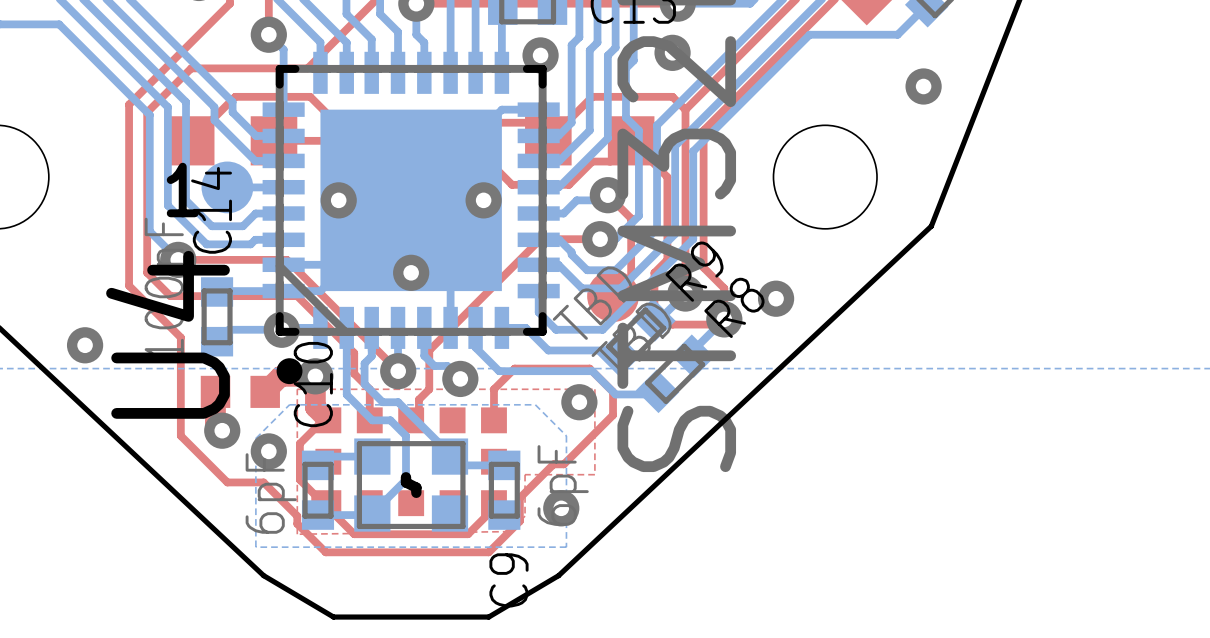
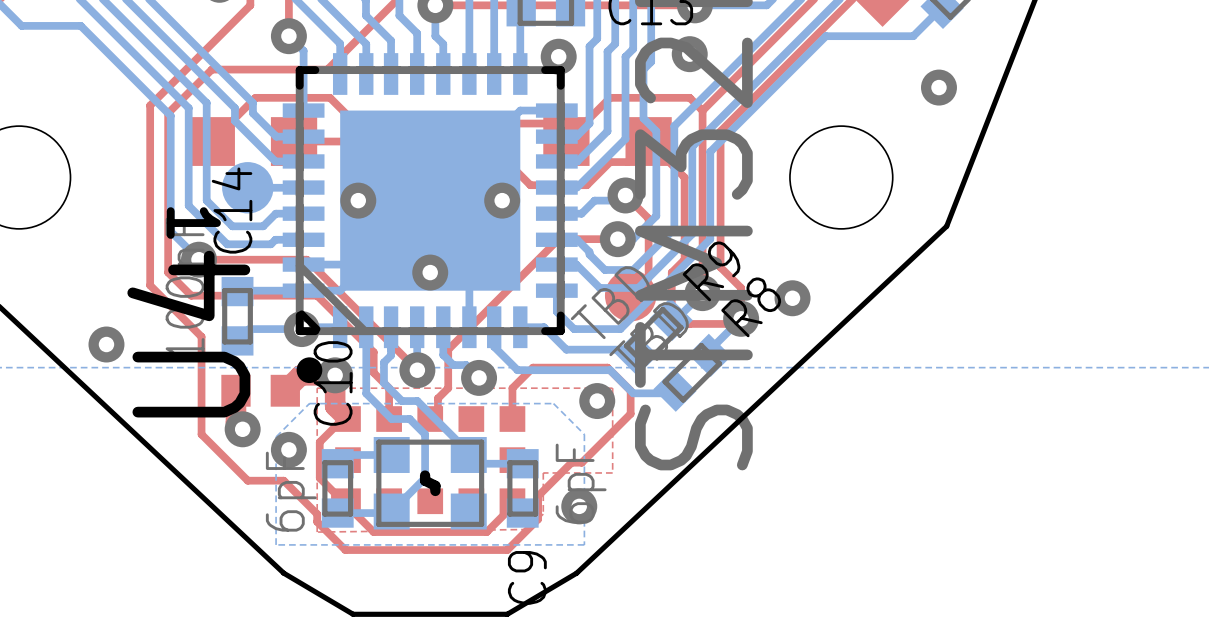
U4 footprint: [262, 51, 560, 349] -> [282, 53, 578, 349]
text rotation: 0° (182, 190) -> 90° clockwise (193, 223)

